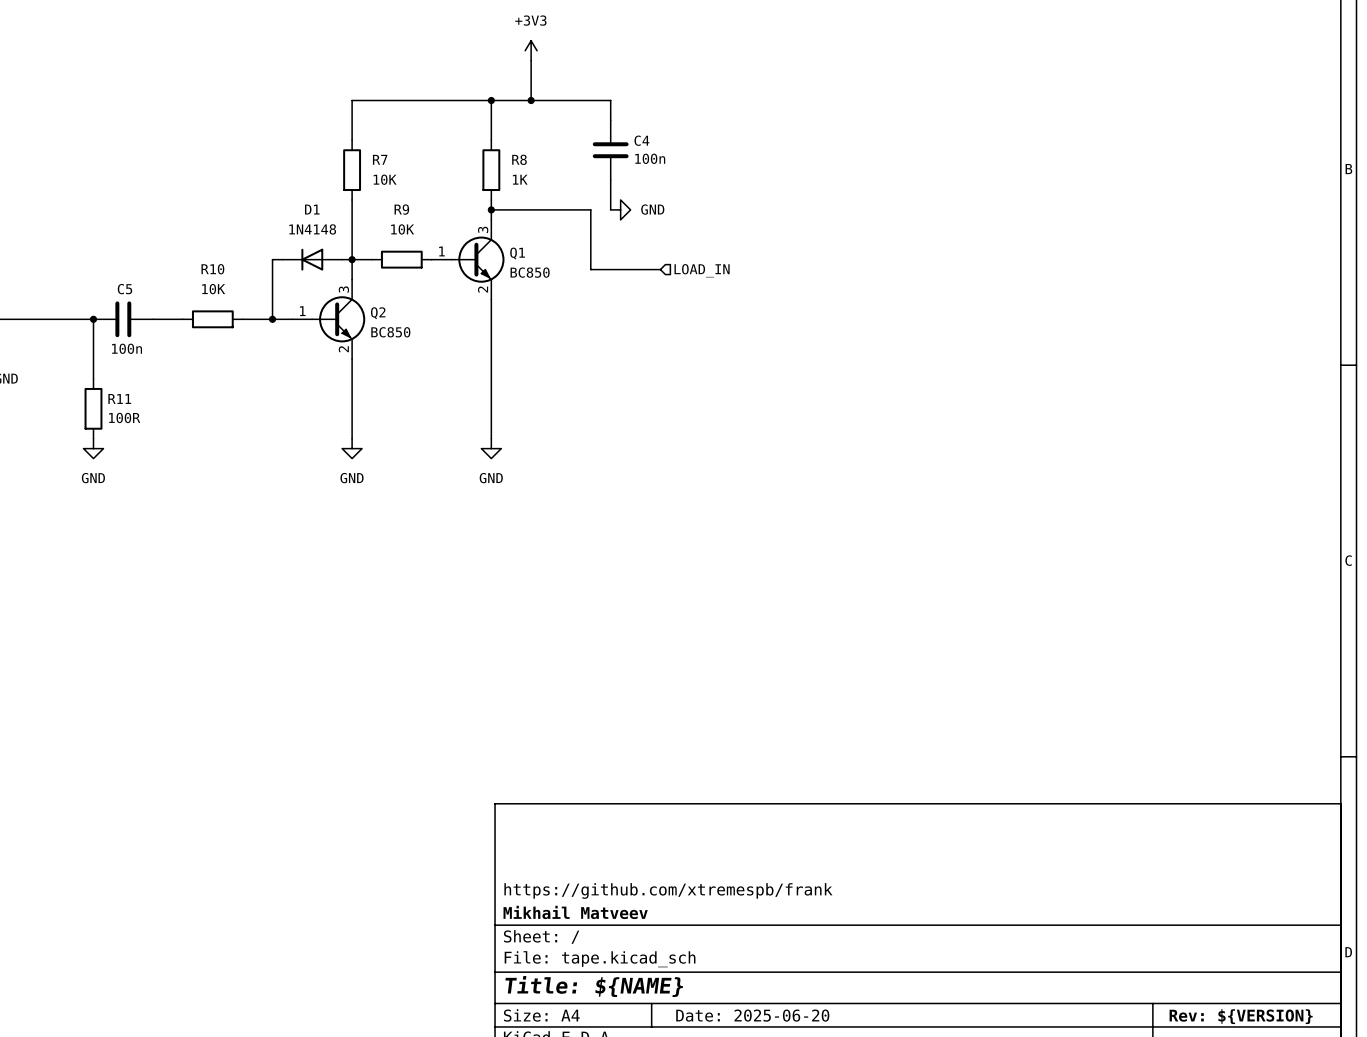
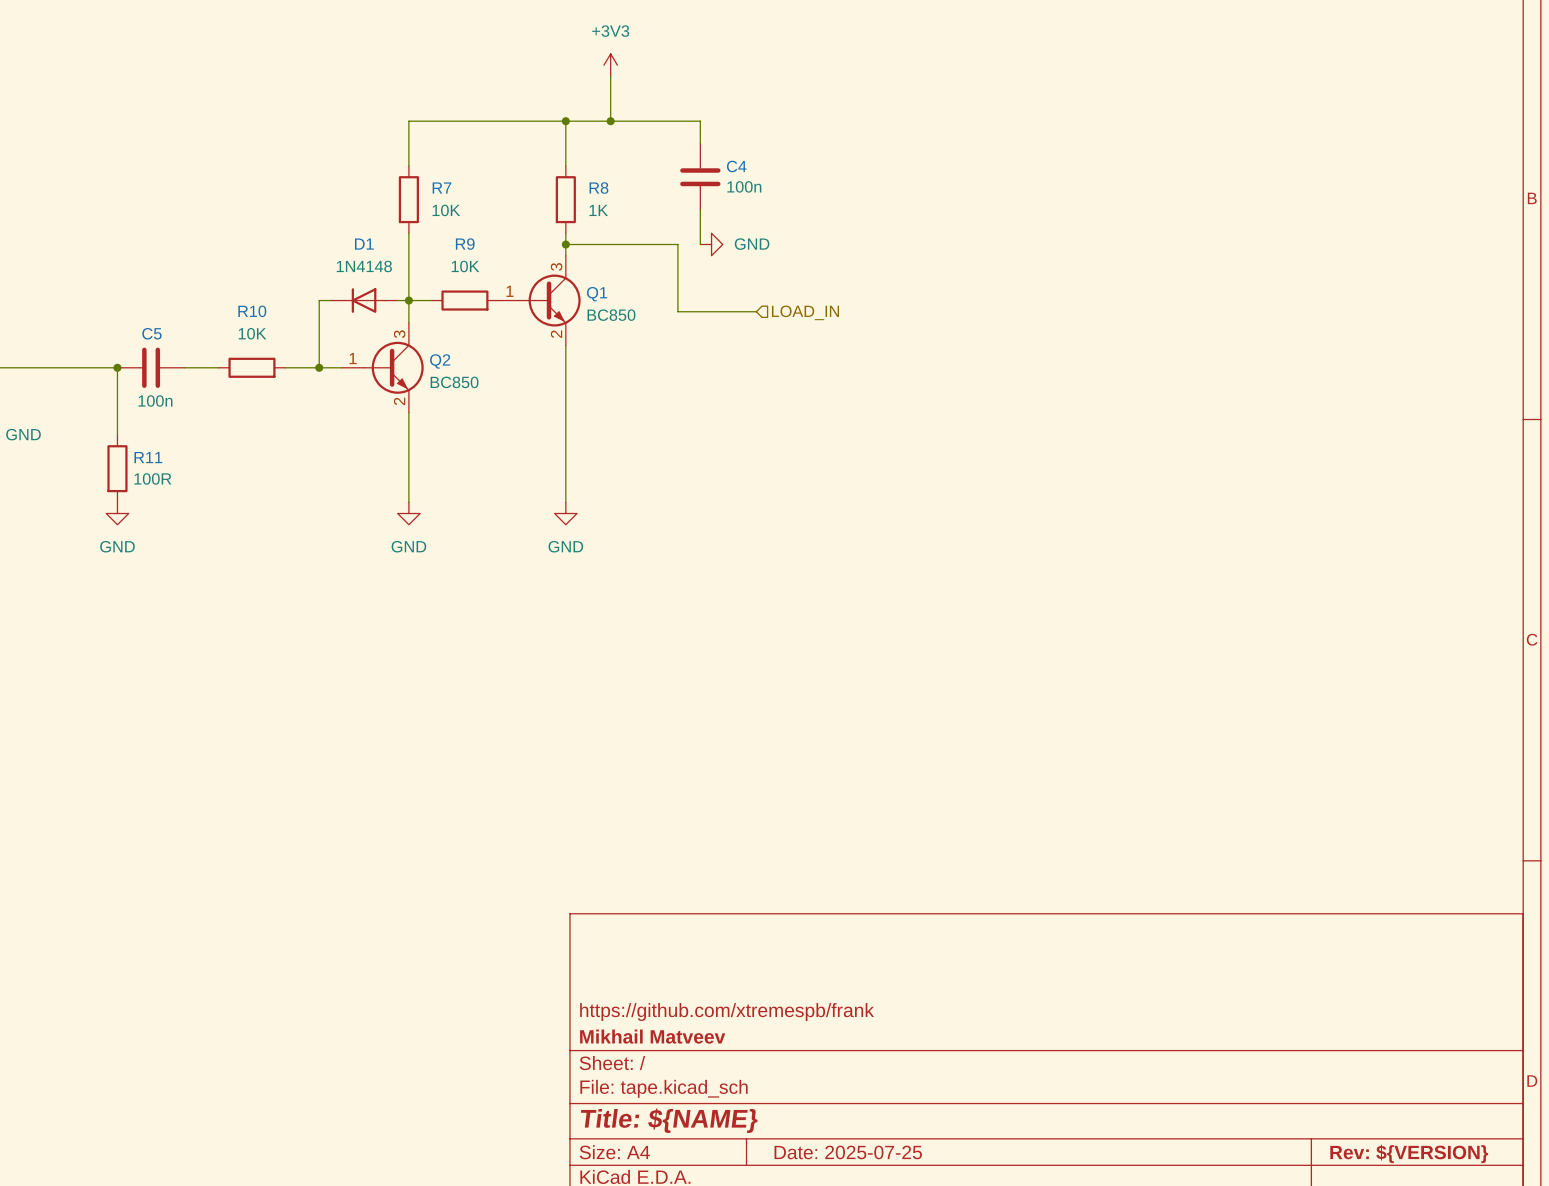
title block: Date: 2025-06-20 (752, 1015) -> Date: 2025-07-25 (848, 1152)

